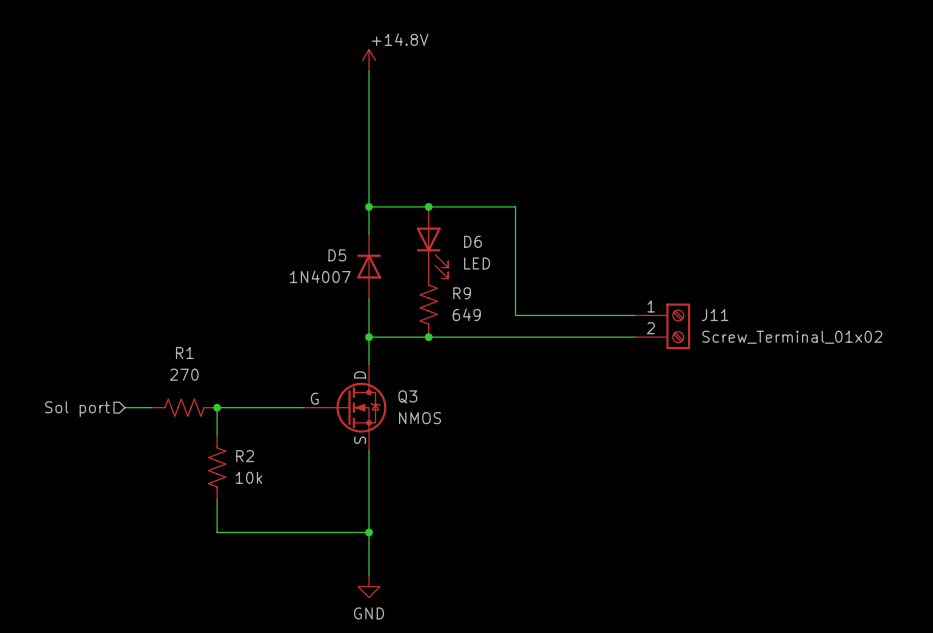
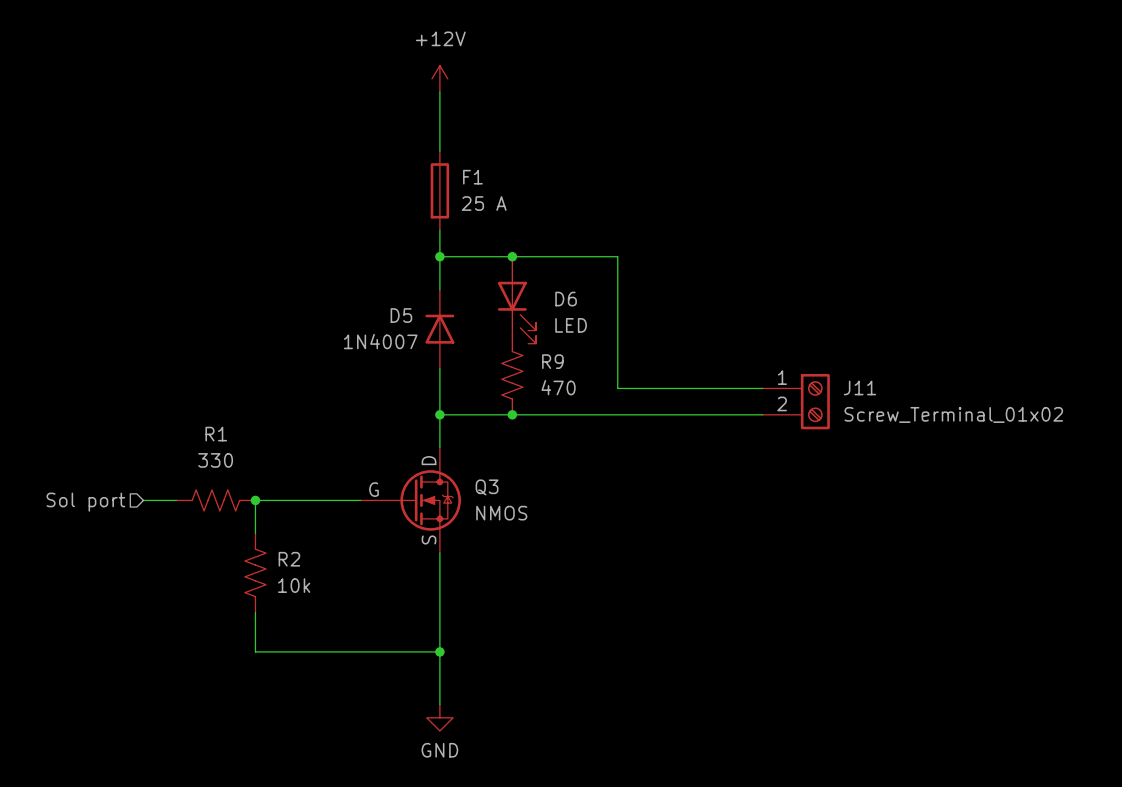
power symbol text: none -> +12V (440, 38)
label: +14.8V (400, 39) -> none
F1: none -> 25 A (439, 190)
R9 value: 649 (466, 314) -> 470 (558, 387)
R1 value: 270 (184, 374) -> 330 (215, 460)

